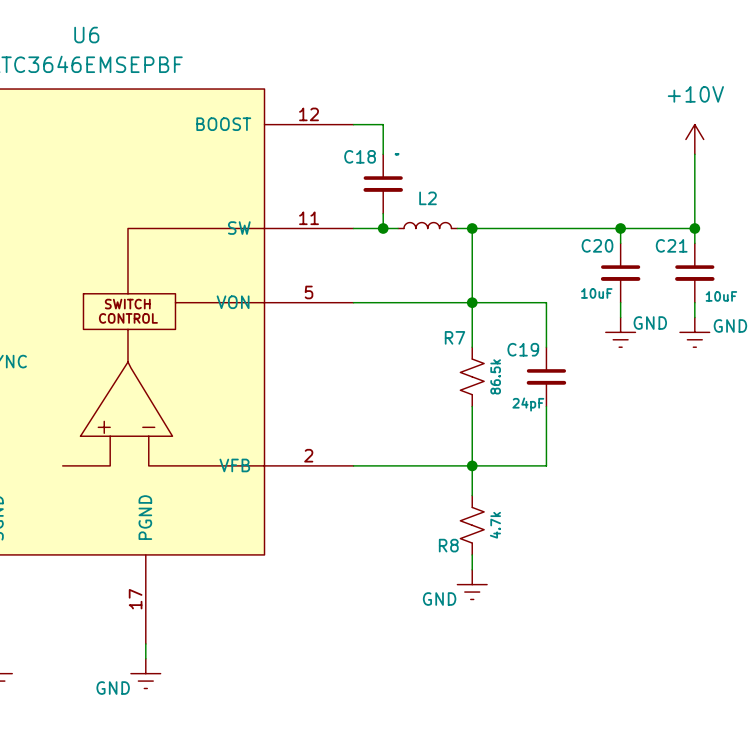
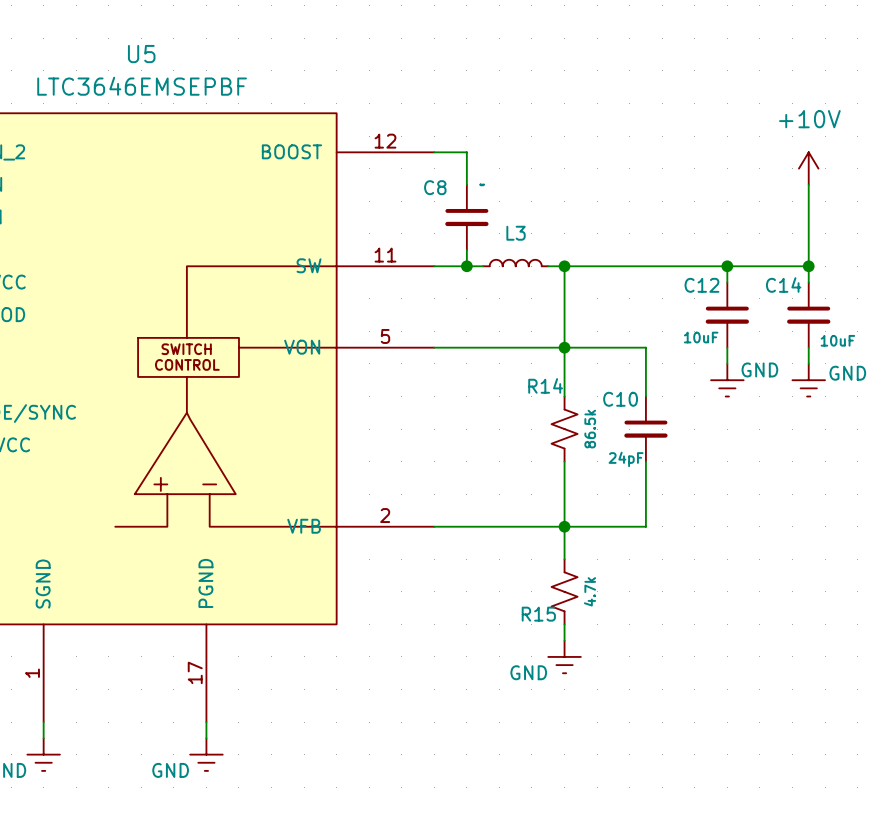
U6 name: U6 (86, 35) -> U5 (141, 54)
C18 name: C18 (360, 156) -> C8 (435, 187)
L2 name: L2 (428, 198) -> L3 (516, 233)
C20 name: C20 (597, 245) -> C12 (701, 285)
C21 name: C21 (671, 245) -> C14 (783, 285)
R7 name: R7 (455, 337) -> R14 (545, 385)
C19 name: C19 (523, 349) -> C10 (620, 399)
R8 name: R8 (448, 545) -> R15 (538, 614)

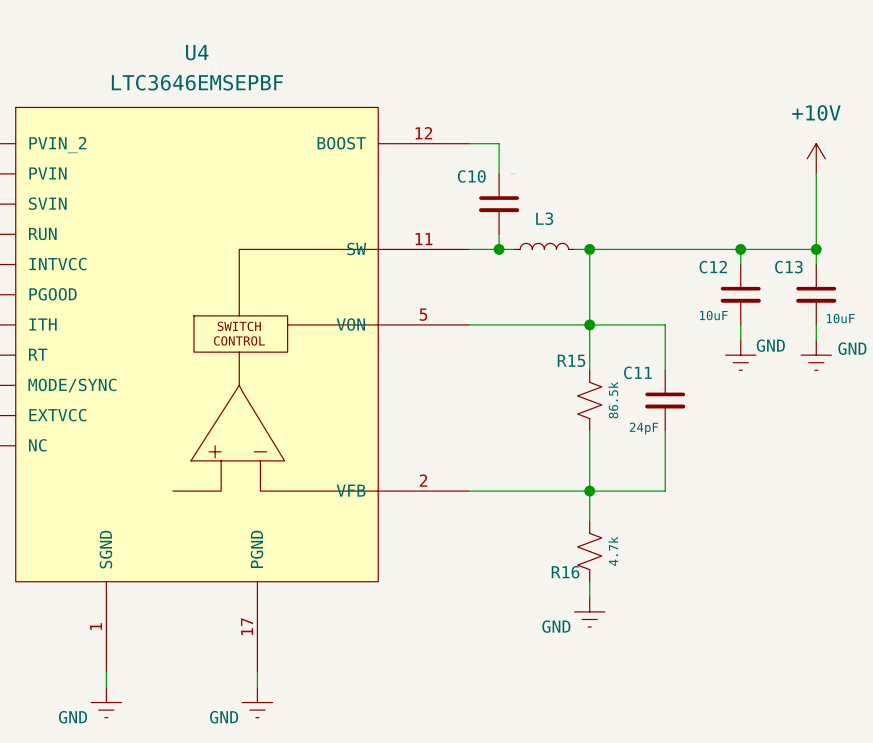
U5 name: U5 (141, 54) -> U4 (197, 52)
C8 name: C8 (435, 187) -> C10 (471, 176)
C14 name: C14 (783, 285) -> C13 (788, 267)
R14 name: R14 (545, 385) -> R15 (571, 360)
C10 name: C10 (620, 399) -> C11 (637, 372)
R15 name: R15 (538, 614) -> R16 (565, 572)

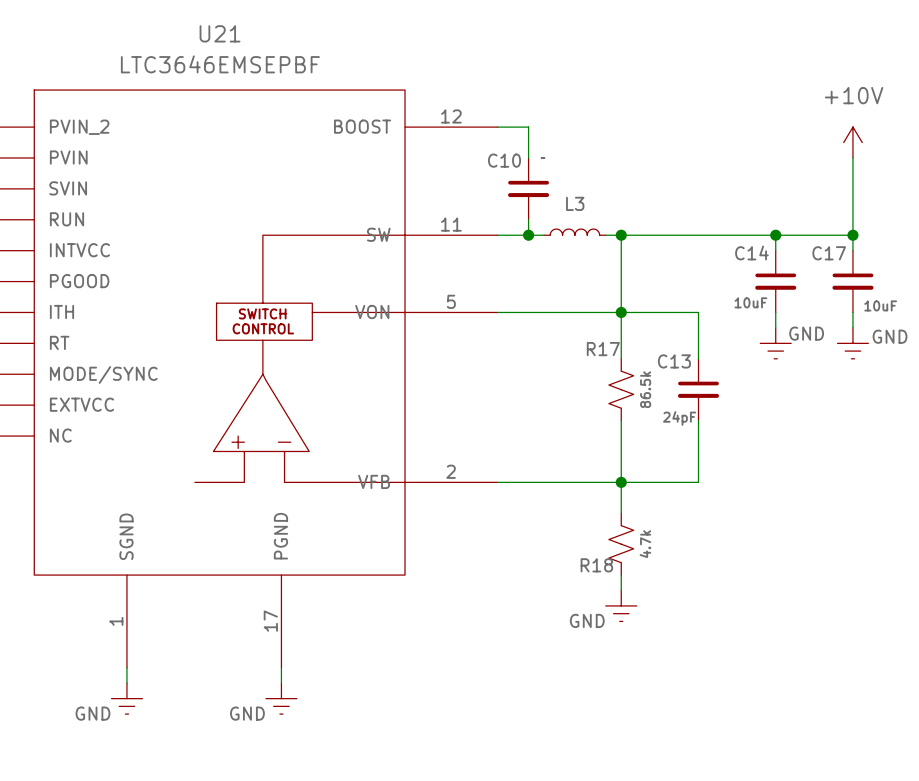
U4 name: U4 (197, 52) -> U21 (220, 33)
C12 name: C12 (713, 267) -> C14 (751, 253)
C13 name: C13 (788, 267) -> C17 (829, 253)
R15 name: R15 (571, 360) -> R17 (603, 349)
C11 name: C11 (637, 372) -> C13 (674, 361)
R16 name: R16 (565, 572) -> R18 (596, 565)

